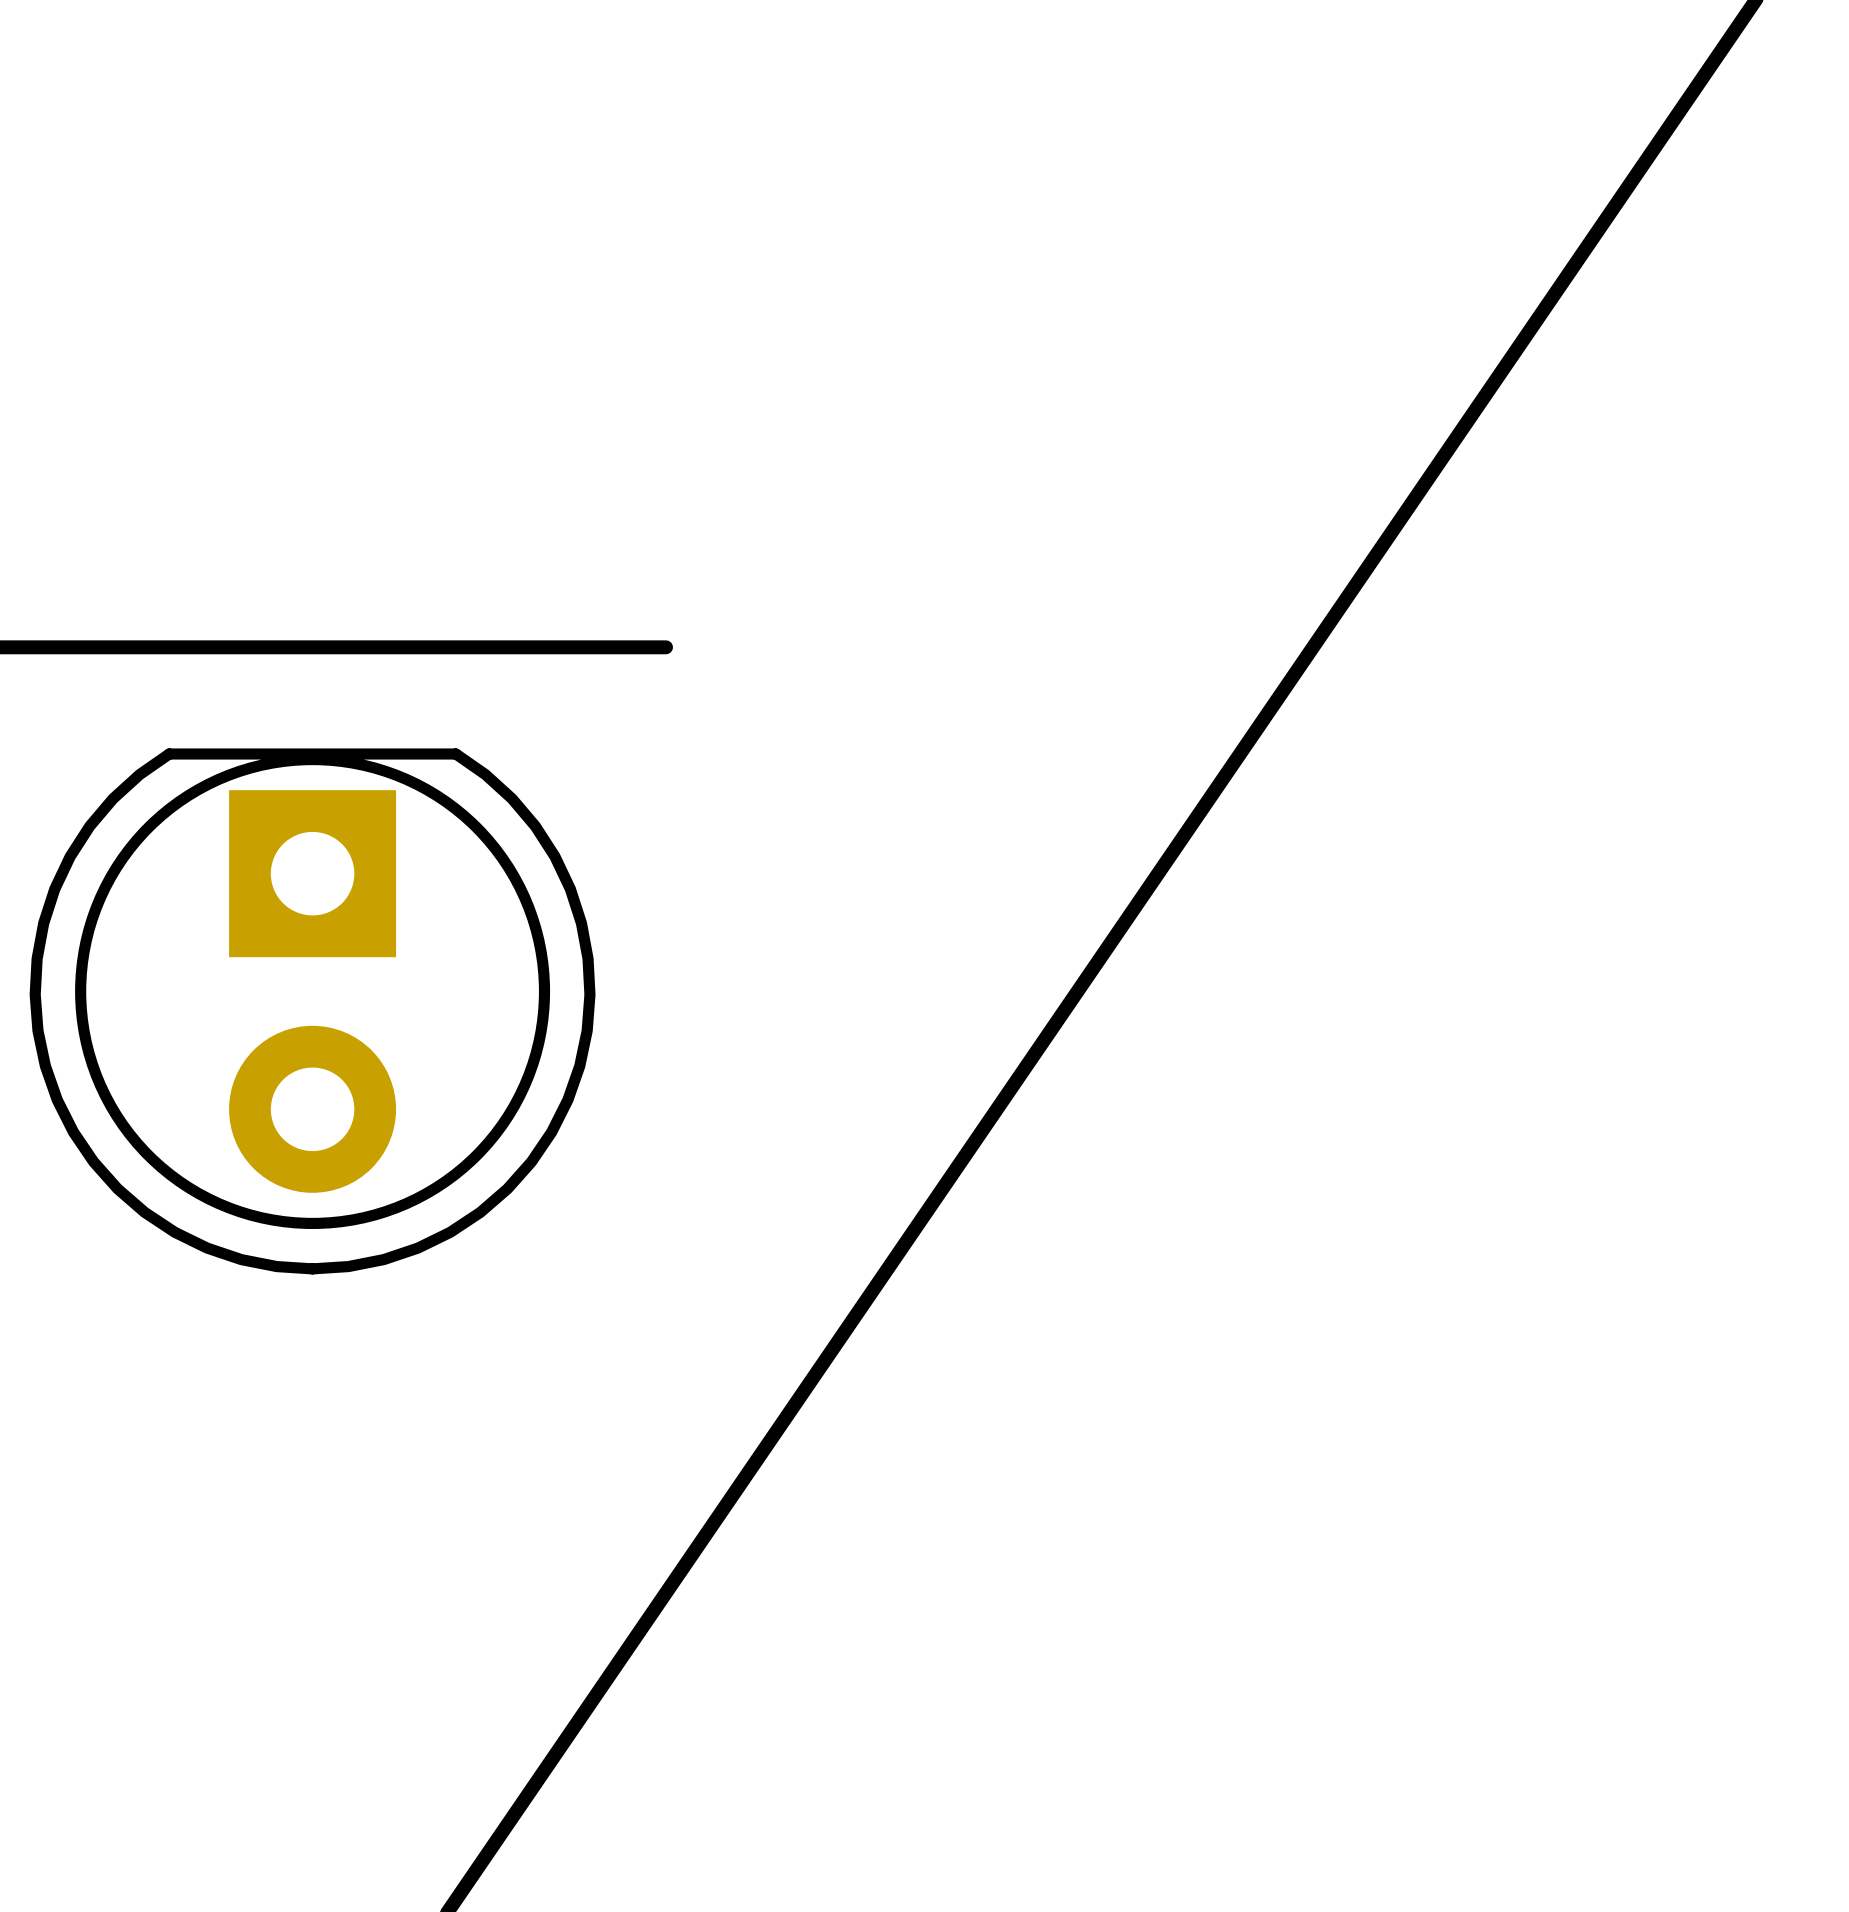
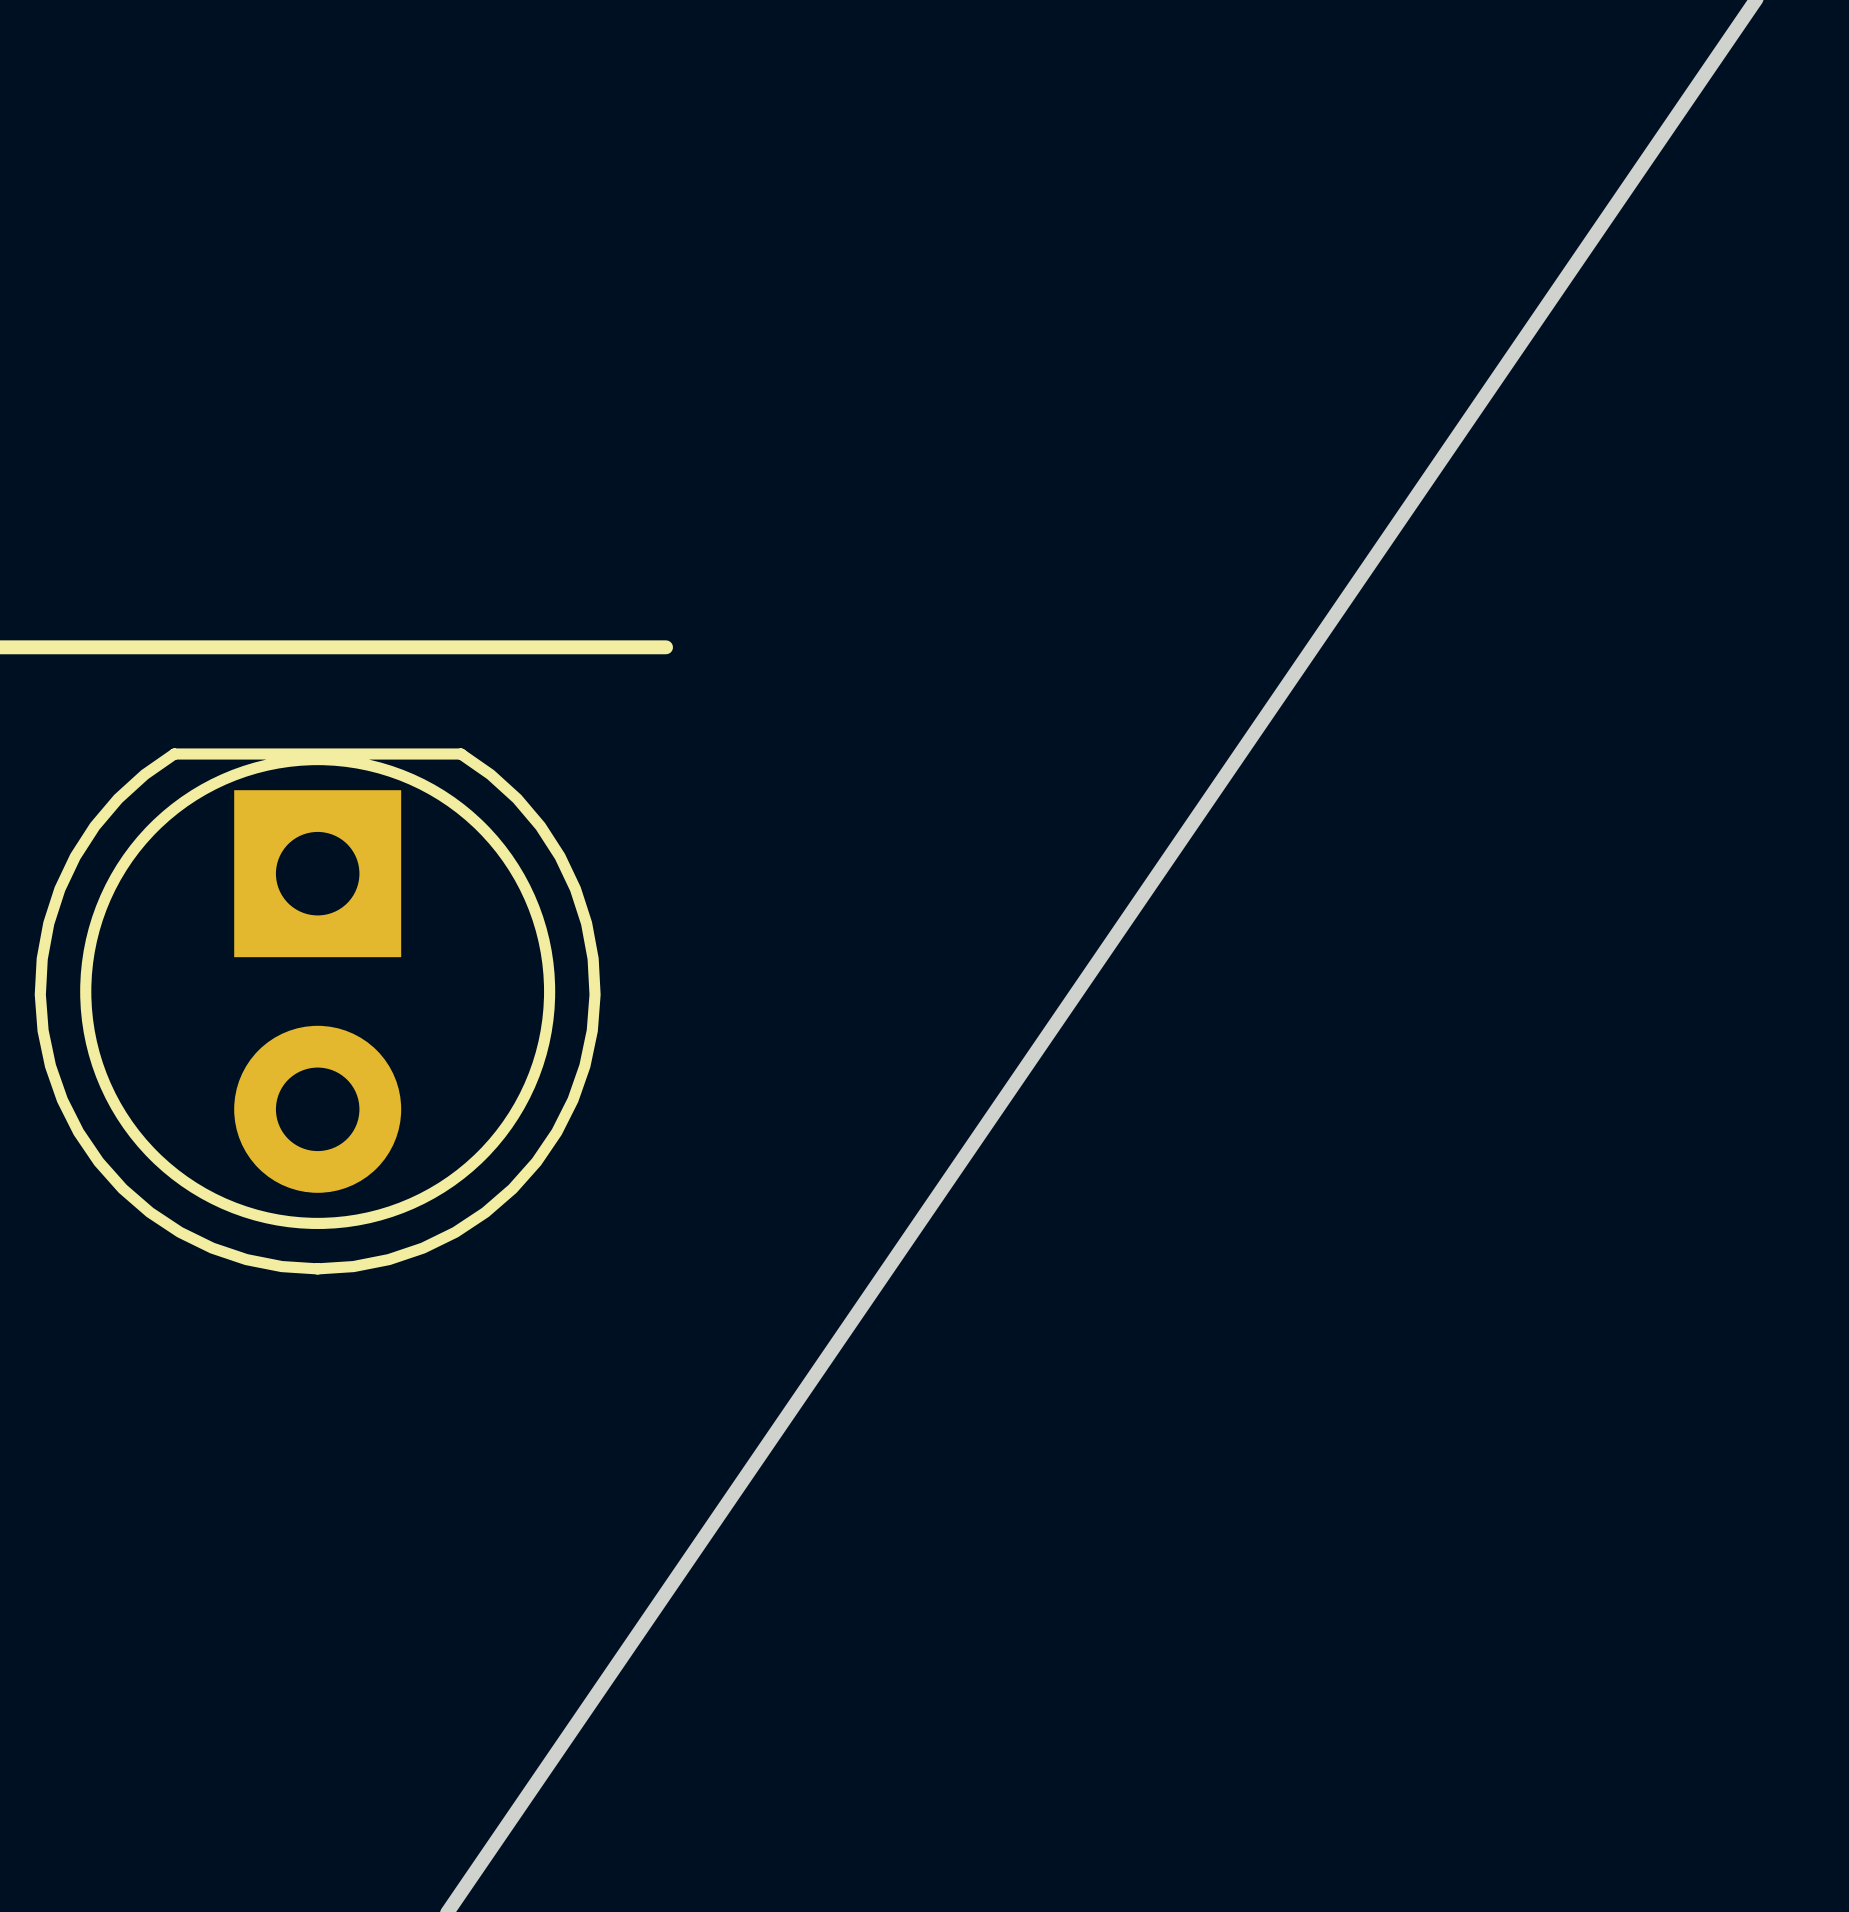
part footprint: [29, 748, 596, 1275] -> [34, 748, 601, 1275]

